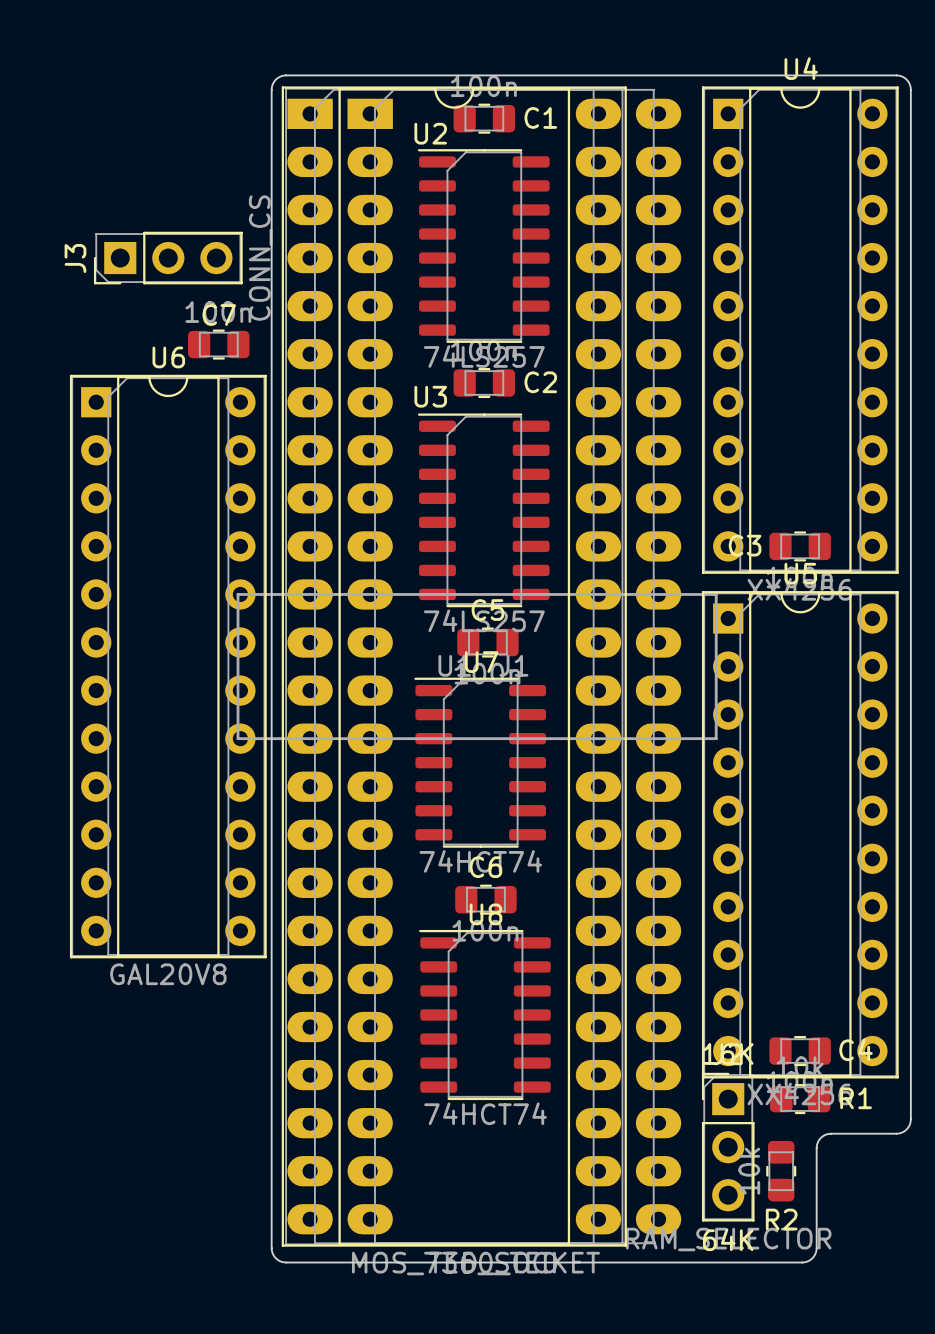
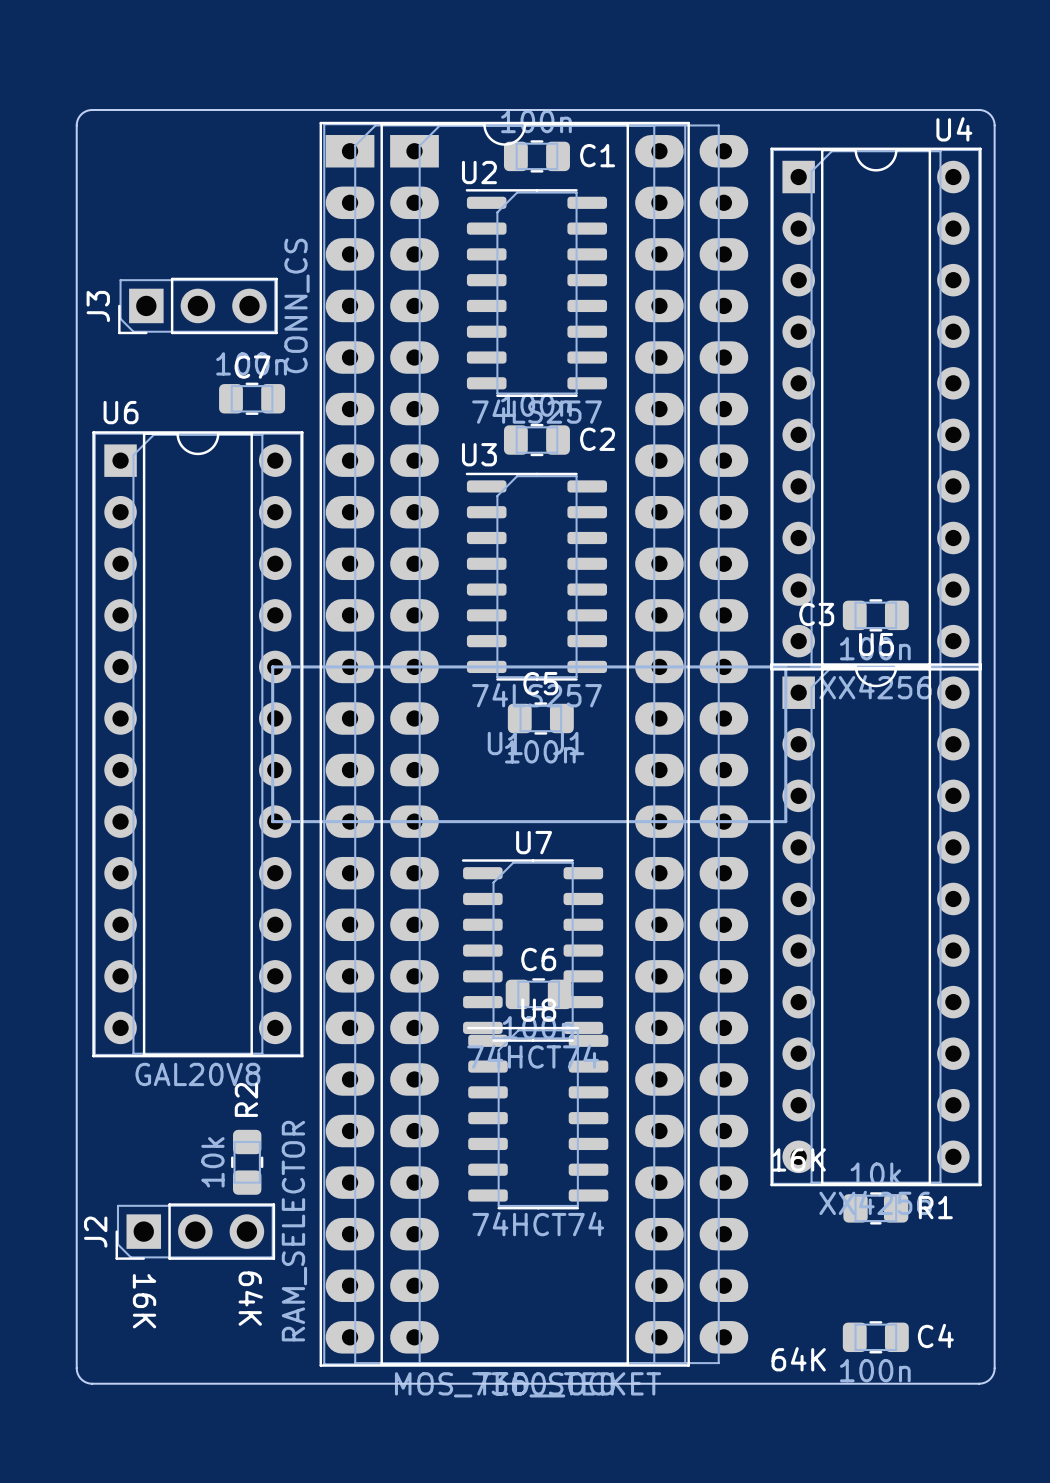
U4 name position: U4 (801, 68) -> U4 (954, 129)
board edge: (286, 75) (275, 79) (271, 89) (271, 1248) (275, 1258) (286, 1262) -> (324, 109) (92, 109) (81, 114) (76, 125) (76, 1370) (81, 1379) (92, 1383) (324, 1383)
U4 position: (800, 330) -> (876, 409)
U6 name position: U6 (168, 357) -> U6 (121, 412)
U7 position: (480, 762) -> (532, 950)
C4 position: (800, 1051) -> (875, 1337)
board edge: (910, 1119) (907, 1128) (900, 1133) (829, 1133) (819, 1139) (816, 1148) (816, 1249) (812, 1258) (802, 1262) -> (994, 1230) (994, 1368) (991, 1377) (985, 1382) (979, 1383) (878, 1383)
J2 rotation: 0° (728, 1147) -> 90° counterclockwise (195, 1231)
J2 position: (728, 1147) -> (195, 1231)
R2 position: (781, 1171) -> (247, 1162)
text: none -> 64K (250, 1298)
text: none -> 16K (144, 1301)
R2 name rotation: 0° (781, 1219) -> 90° counterclockwise (246, 1099)
R2 name position: R2 (781, 1219) -> R2 (246, 1099)

